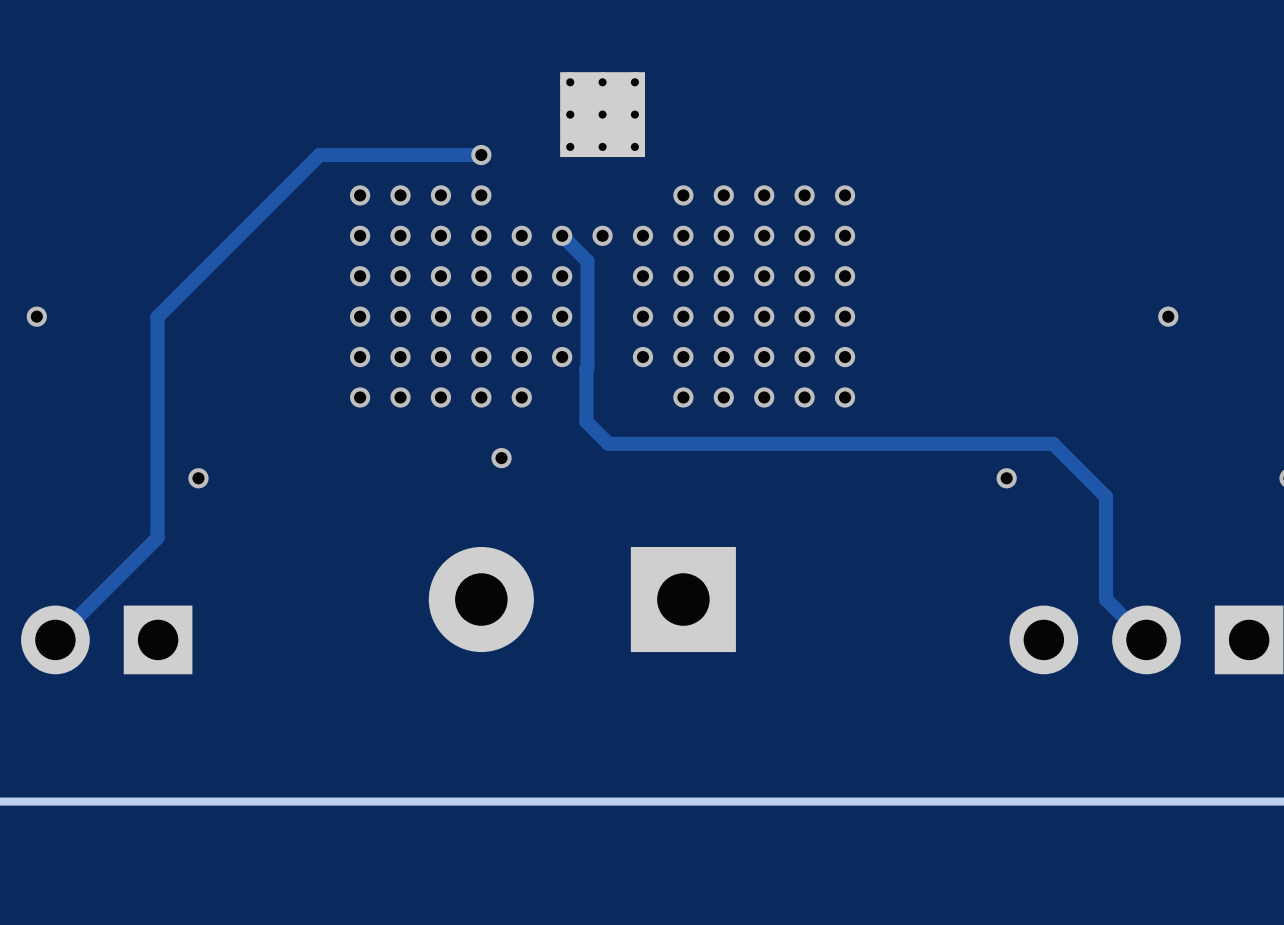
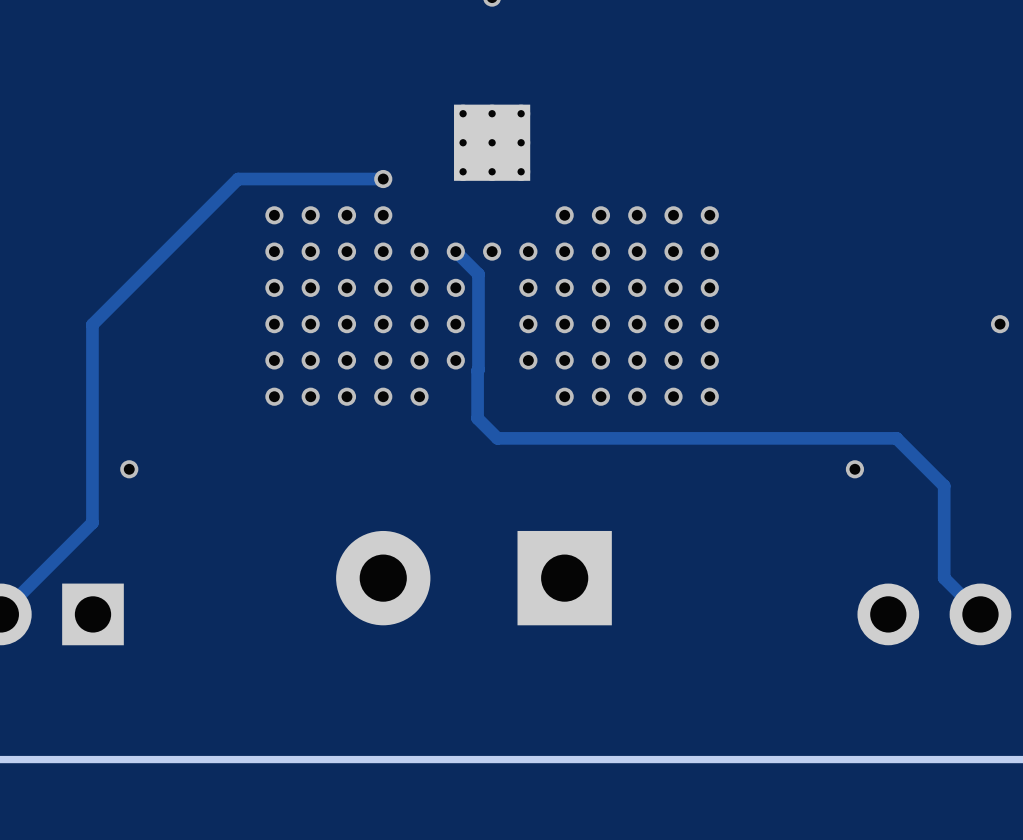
via: (501, 458) -> none

